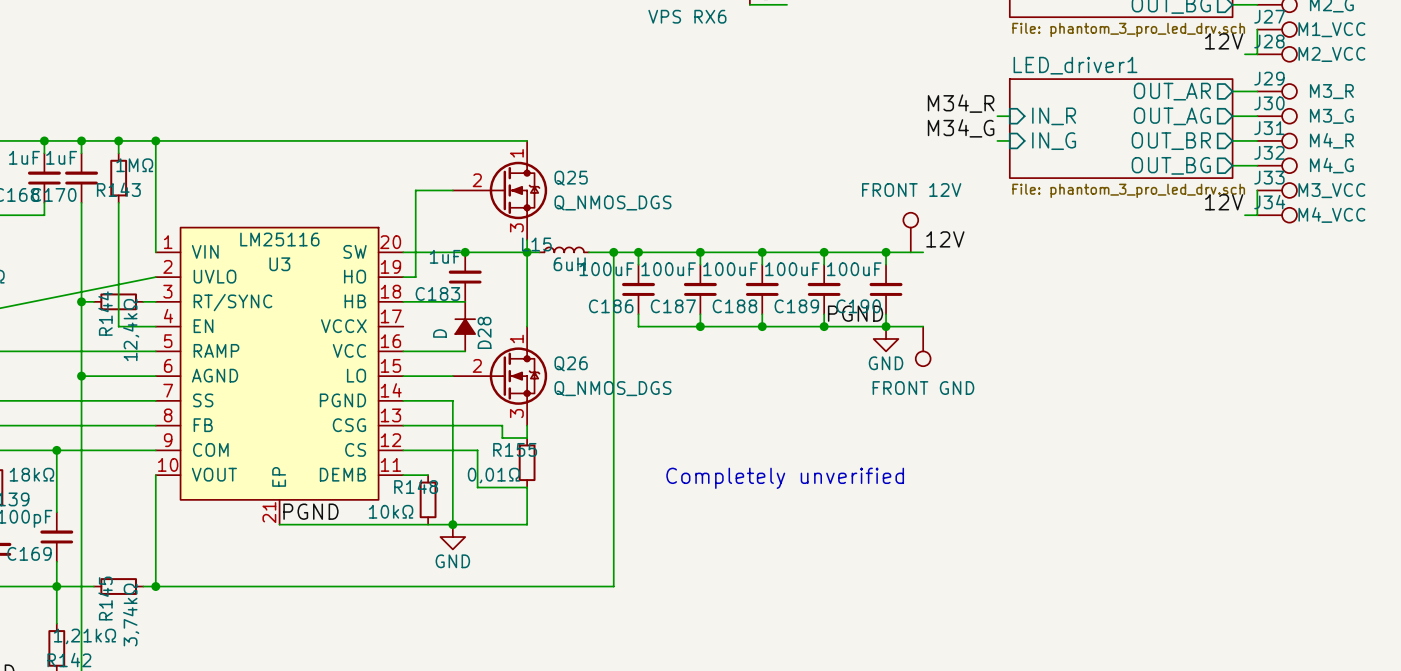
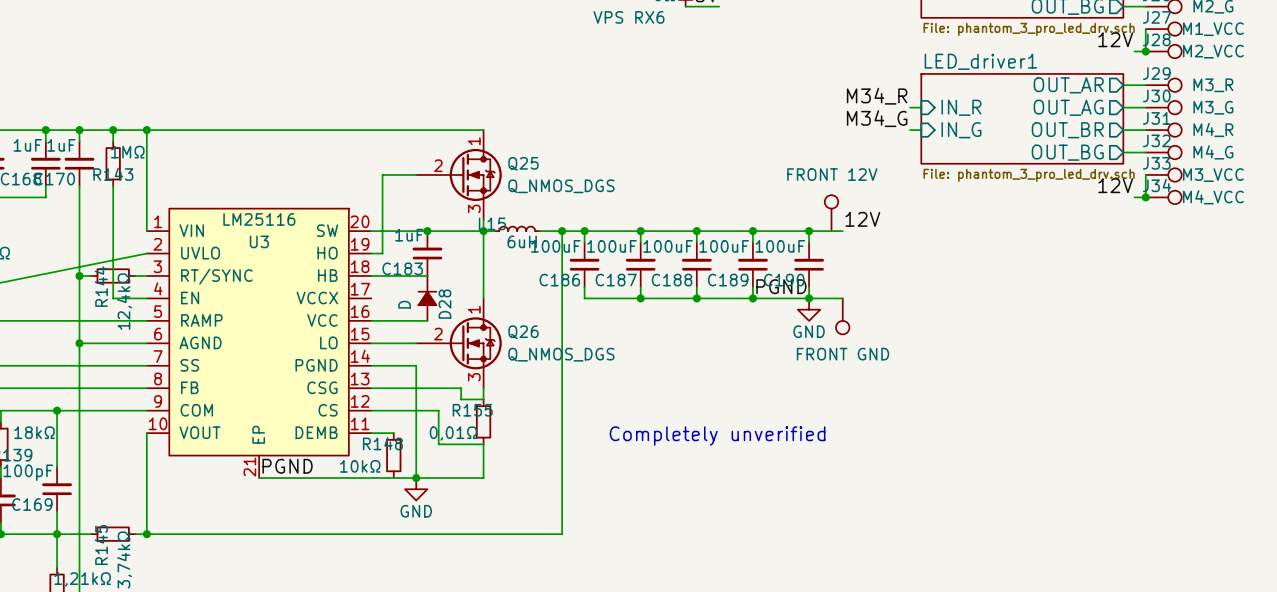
junction: none -> (1145, 51)
junction: none -> (1145, 197)

